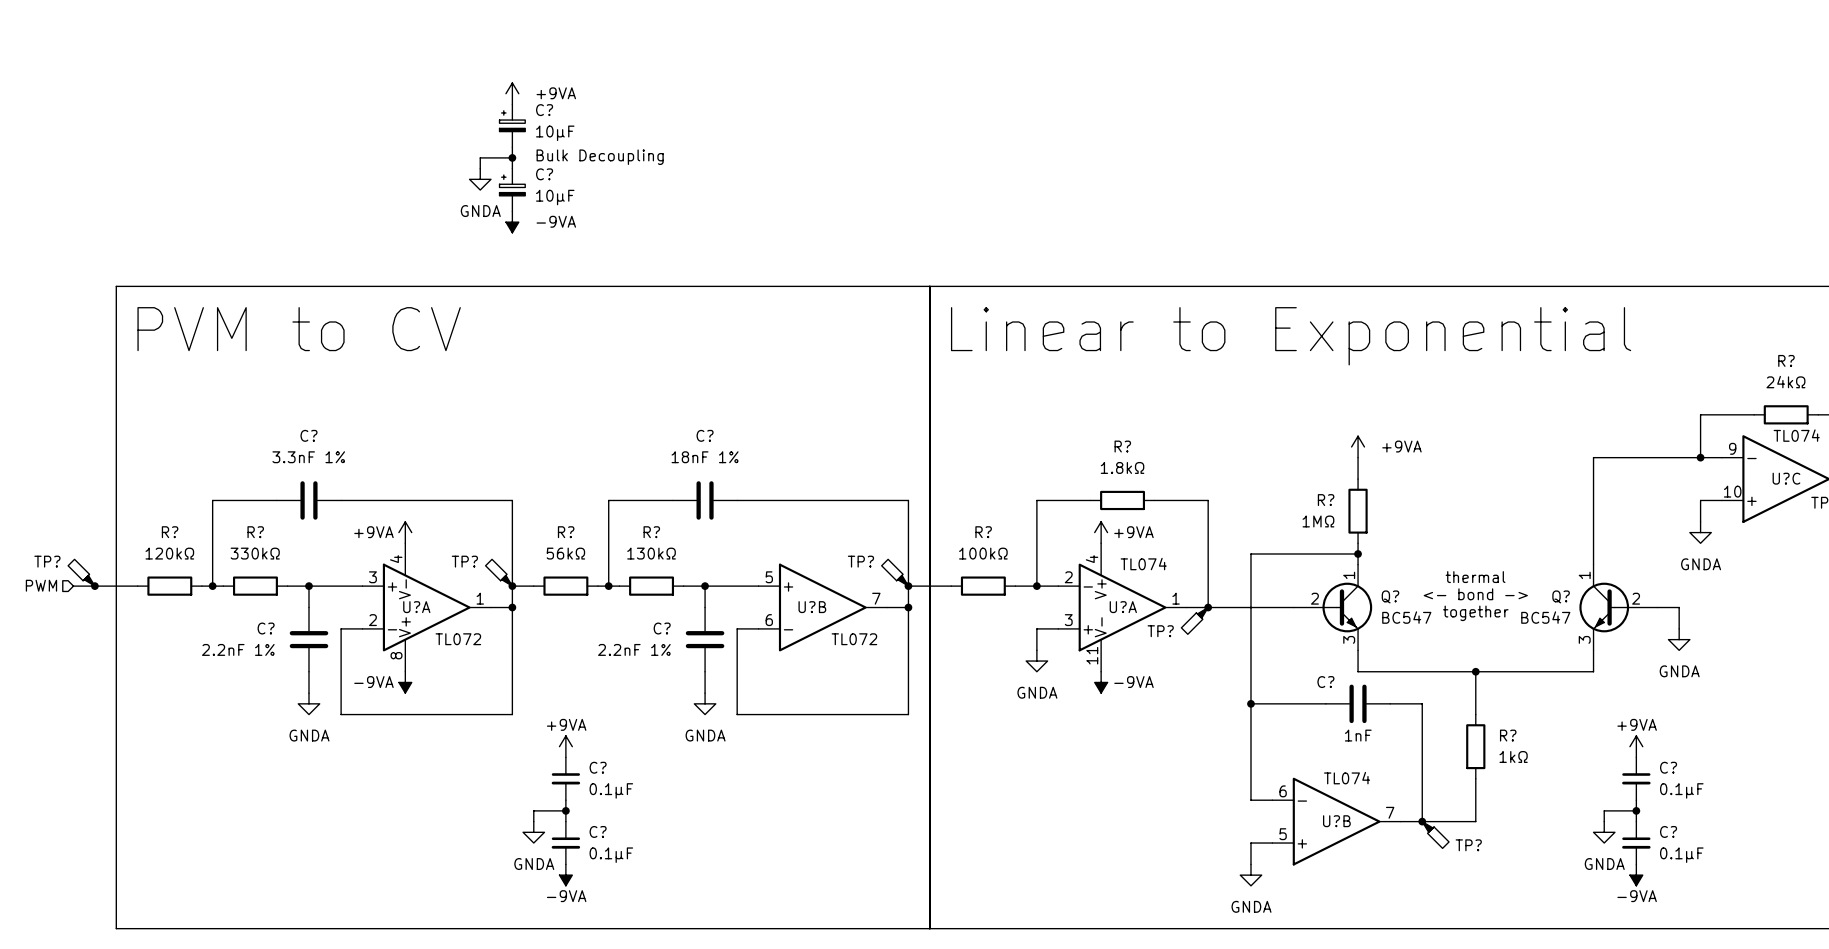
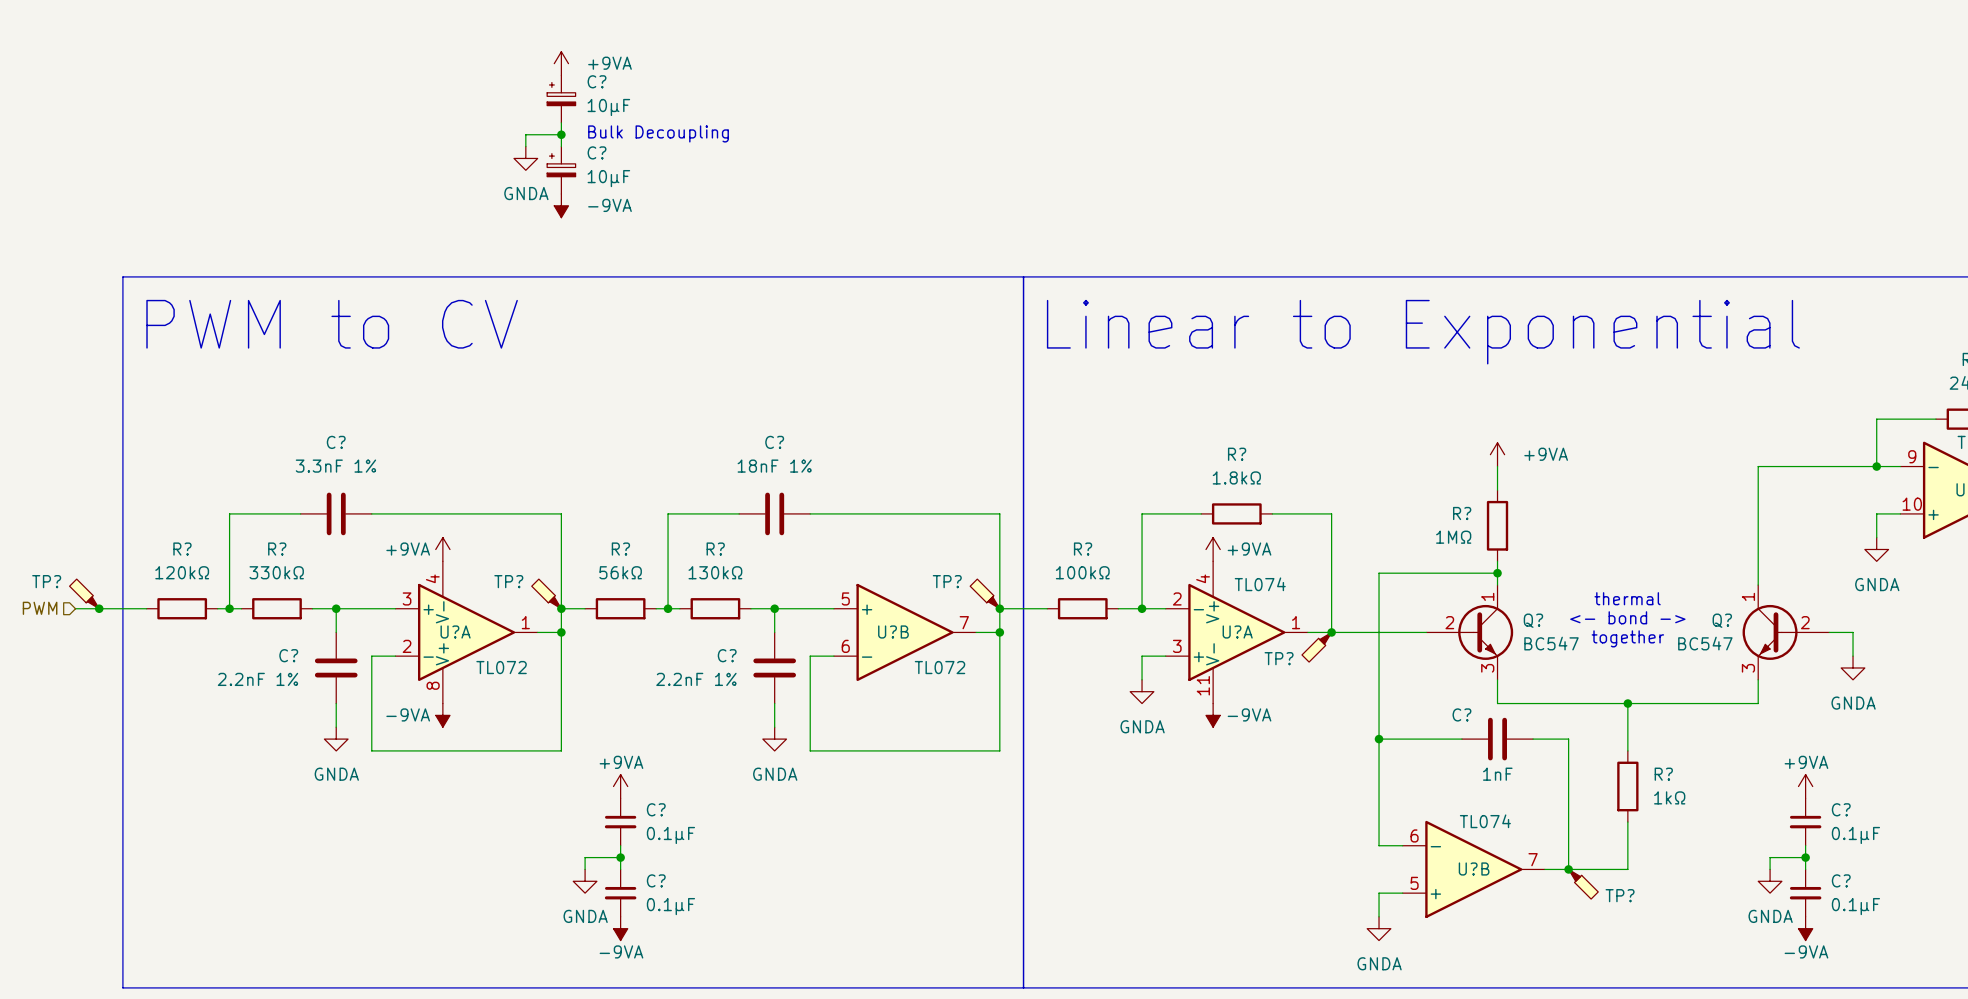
text: PVM to CV (299, 329) -> PWM to CV (332, 324)

